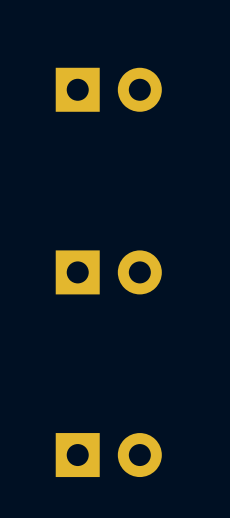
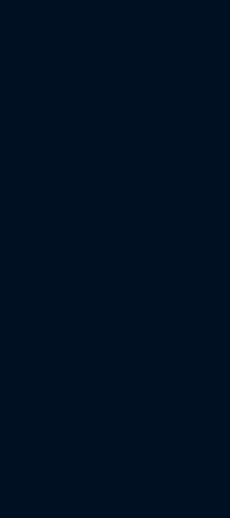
part: (108, 89) -> none
part: (108, 272) -> none
part: (108, 455) -> none

